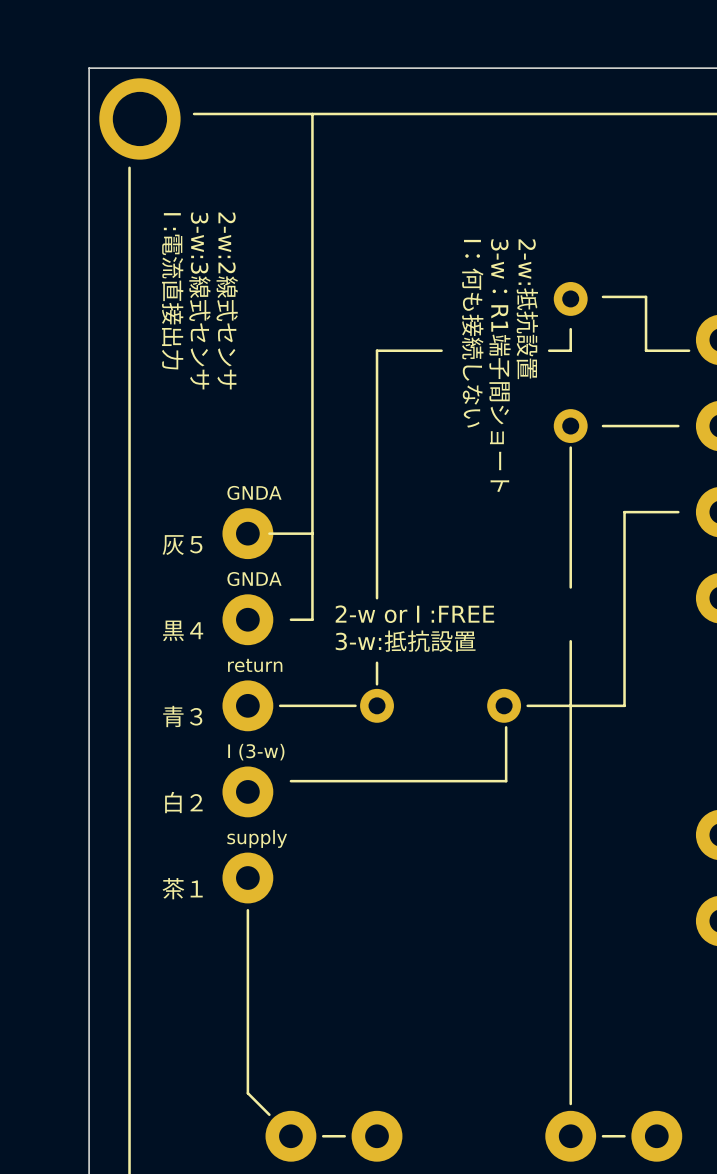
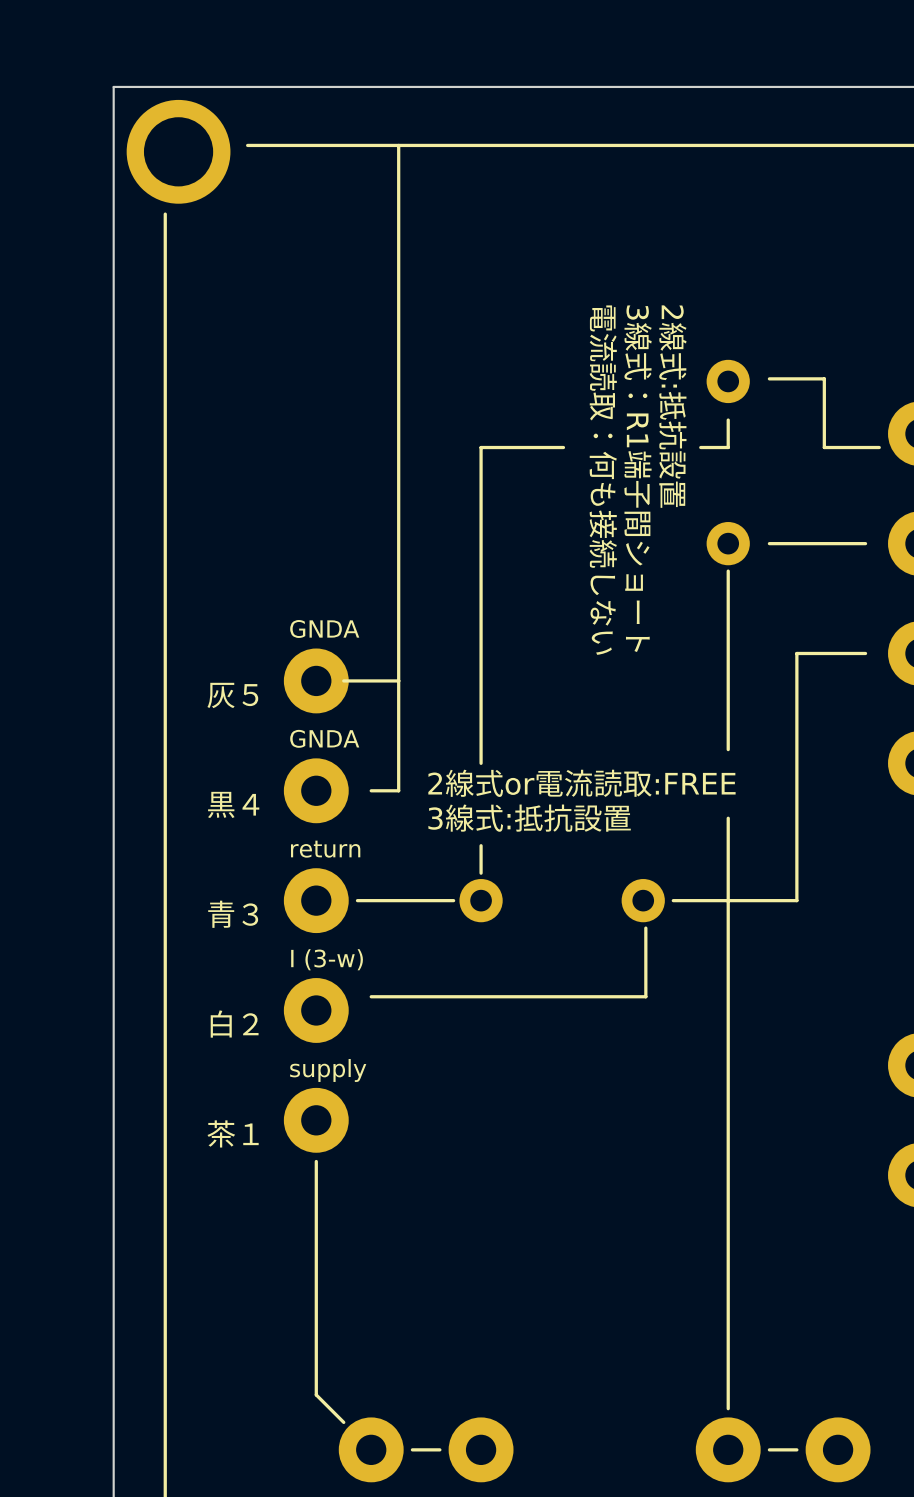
text: I :電流直接出力 (172, 291) -> none
text: 2-w:2線式センサ (227, 300) -> none
text: 3-w:3線式センサ (199, 301) -> none
text: 2-w:抵抗設置 (527, 309) -> 2線式:抵抗設置 (672, 406)
text: I：何も接続しない (472, 333) -> 電流読取：何も接続しない (603, 480)
text: 3-w：R1端子間ショート (500, 365) -> 3線式：R1端子間ショート (638, 478)
text: 2-w or I :FREE (414, 614) -> 2線式or電流読取:FREE (581, 783)
text: 3-w:抵抗設置 (405, 641) -> 3線式:抵抗設置 (529, 818)

